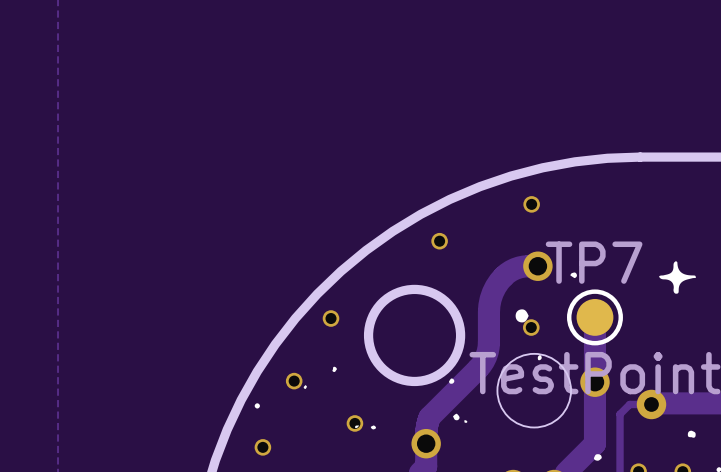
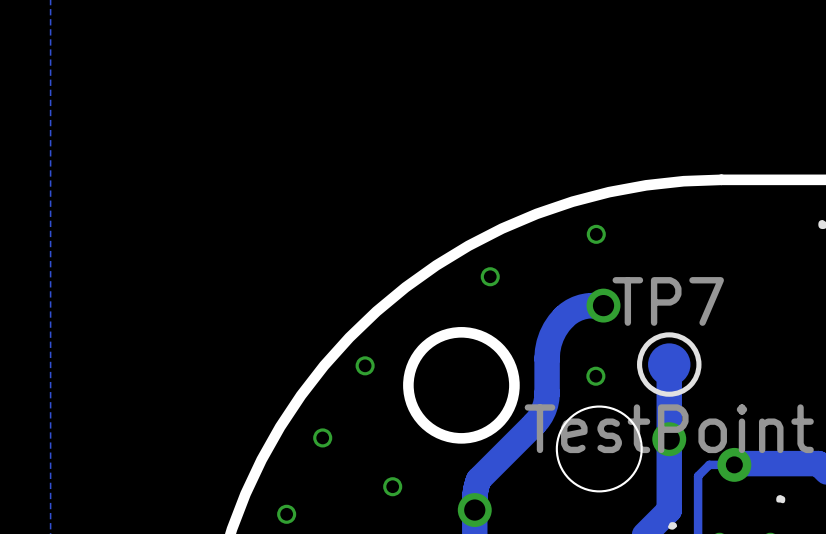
drawing: [659, 261, 697, 294] -> none
drawing: [570, 272, 577, 279] -> none
drawing: [515, 309, 542, 361] -> none
drawing: [303, 366, 337, 389] -> none
drawing: [449, 378, 468, 423] -> none
drawing: [254, 403, 260, 409] -> none
drawing: [355, 425, 377, 430] -> none

